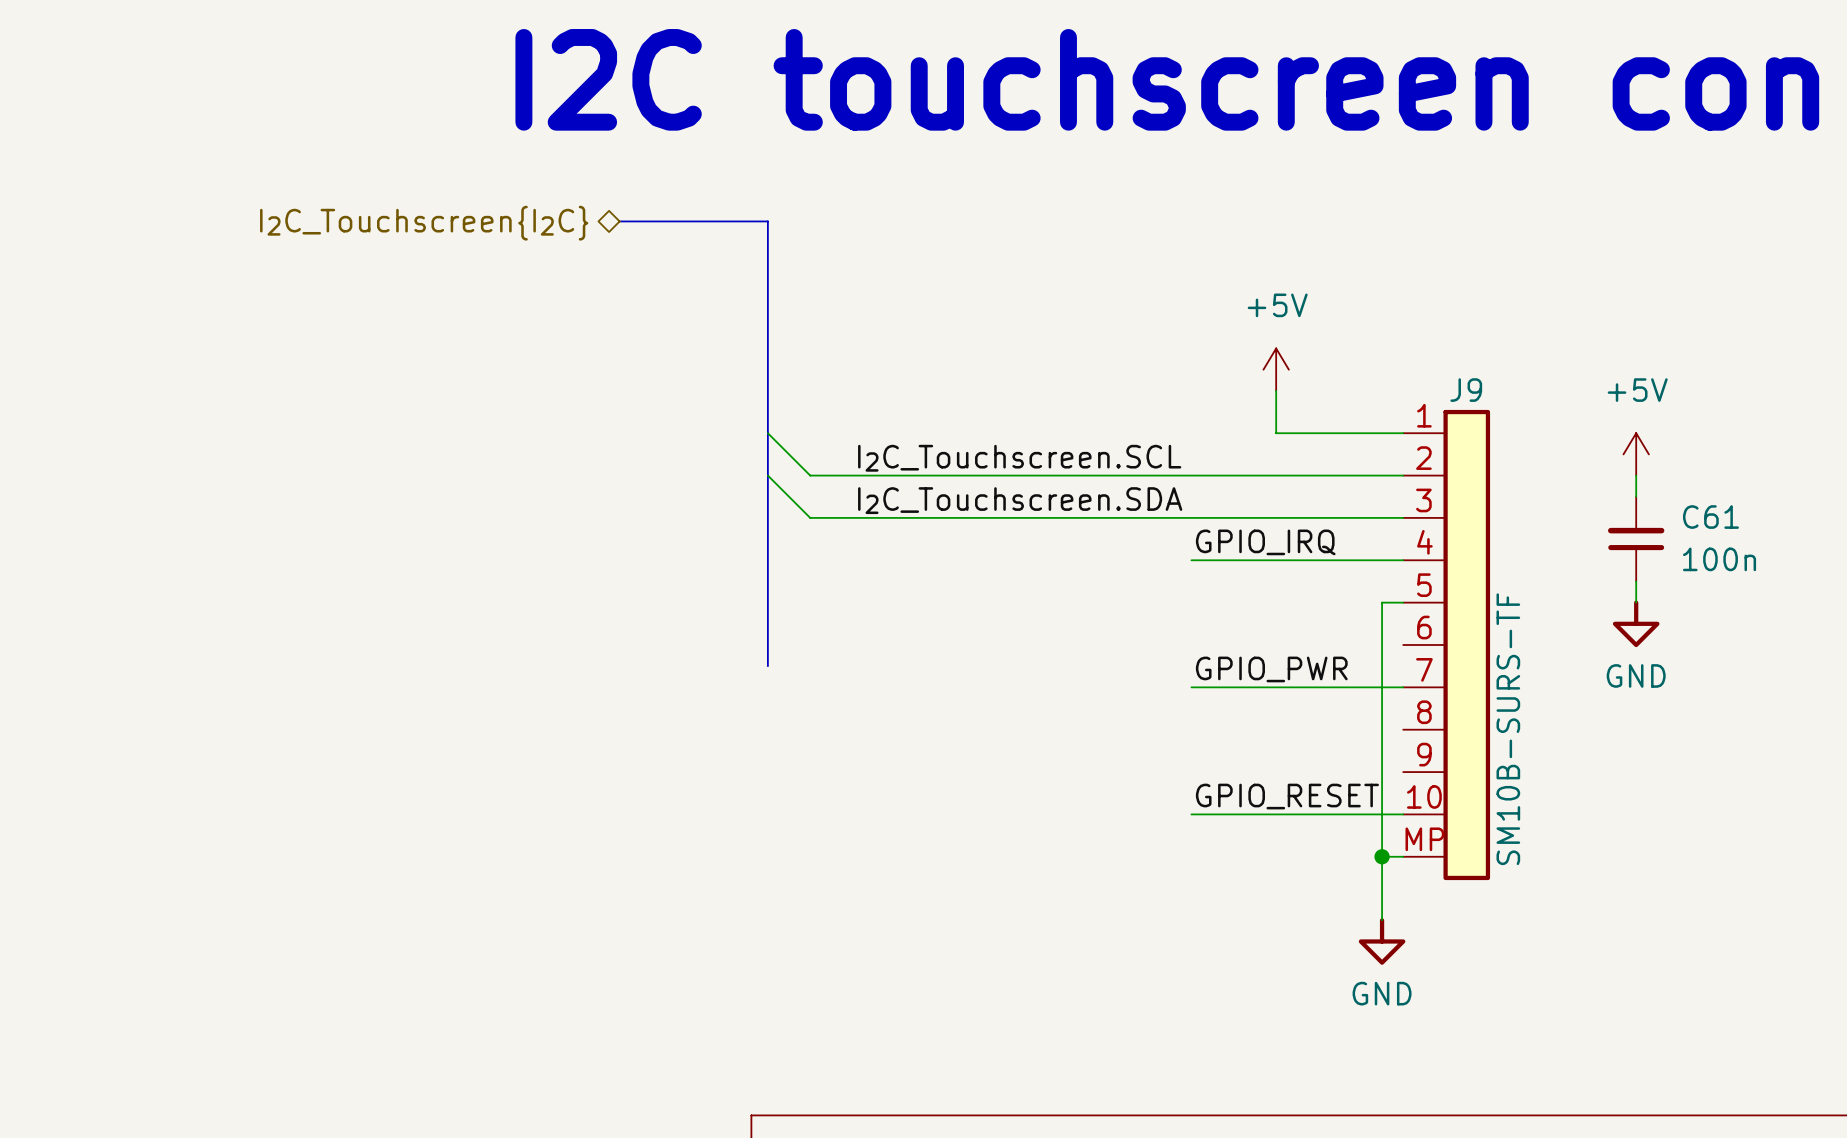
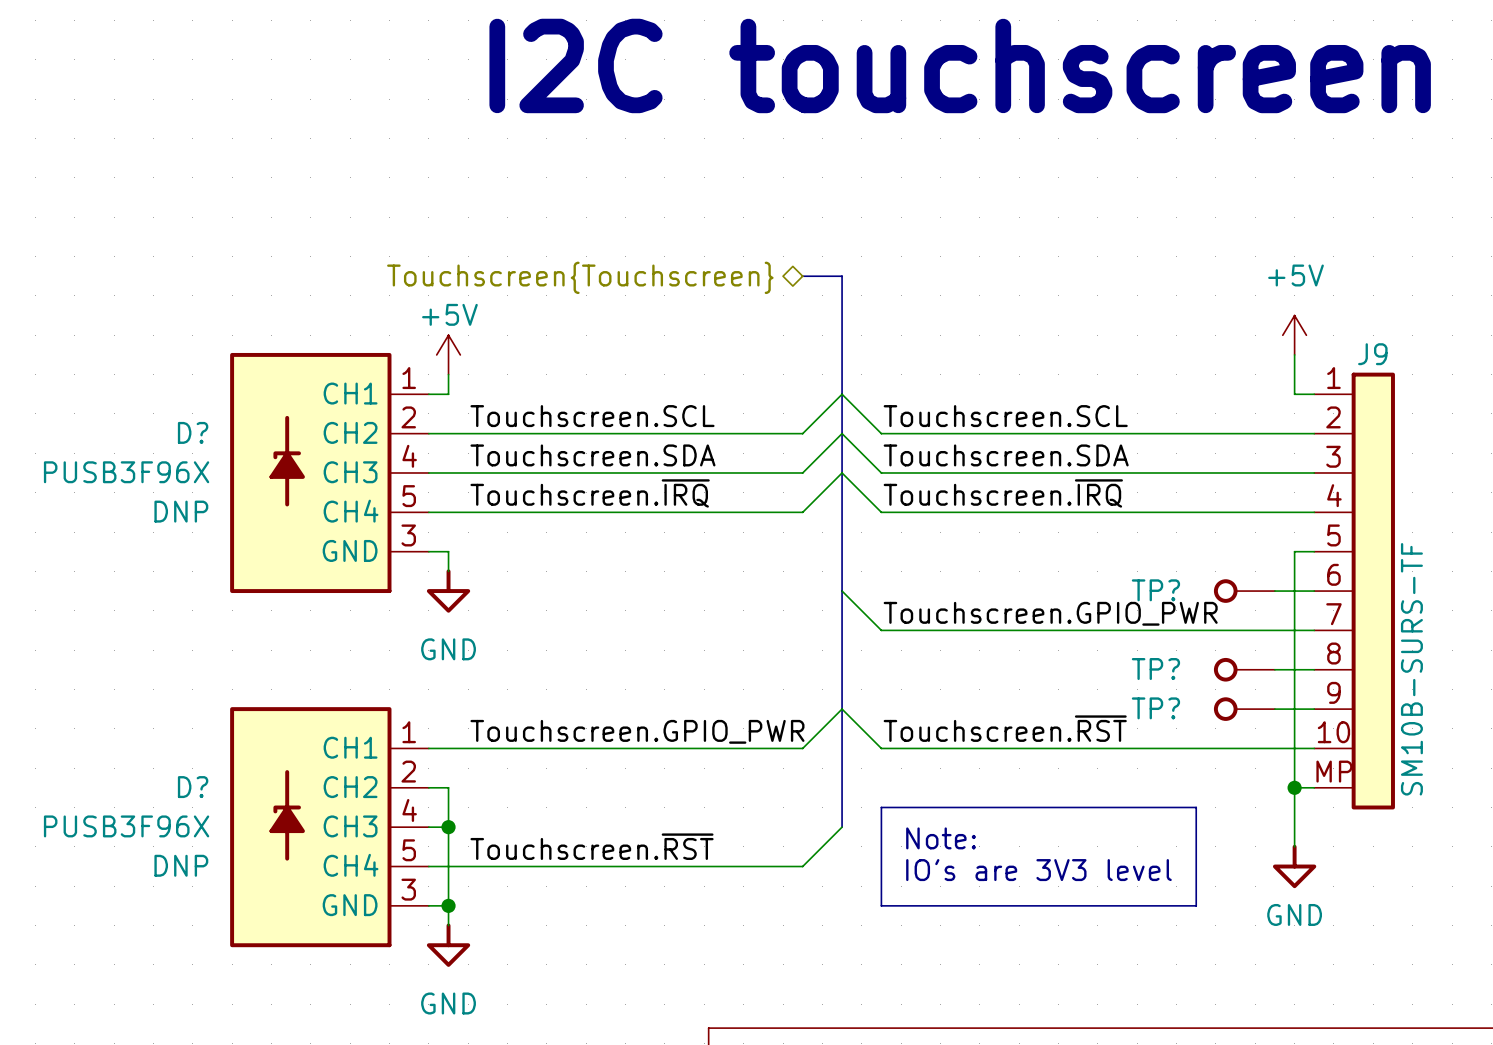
bus: (619, 221) (767, 221) (767, 666) -> none
hierarchical label: I2C_Touchscreen{I2C} (424, 223) -> none
bus: none -> (802, 276) (842, 276) (842, 827)
hierarchical label: none -> Touchscreen{Touchscreen} (580, 277)
power symbol position: +5V (1276, 369) -> +5V (1294, 335)
power symbol: none -> +5V (448, 354)
wire: (1276, 390) (1276, 433) (1382, 433) -> (1294, 354) (1294, 394)
wire: none -> (448, 374) (448, 394) (428, 394)
wire: (767, 433) (810, 475) -> (428, 433) (763, 433)
label: none -> Touchscreen.SCL (592, 416)
label: none -> Touchscreen.SCL (1005, 416)
label: I2C_Touchscreen.SCL (1019, 458) -> none
wire: (767, 475) (810, 517) -> (428, 472) (763, 472)
wire: (852, 475) (937, 475) -> (802, 433) (842, 394) (881, 433)
label: none -> Touchscreen.SDA (592, 455)
label: none -> Touchscreen.SDA (1006, 455)
label: I2C_Touchscreen.SDA (1020, 500) -> none
D?: none -> (329, 472)
wire: (852, 517) (937, 517) -> (802, 472) (842, 433) (881, 472)
label: none -> Touchscreen.~{IRQ} (590, 493)
label: none -> Touchscreen.~{IRQ} (1003, 493)
label: GPIO_IRQ (1265, 542) -> none
wire: none -> (428, 512) (802, 512) (842, 472) (881, 512) (1117, 512)
wire: none -> (428, 551) (448, 551) (448, 571)
power symbol: none -> GND (448, 591)
wire: none -> (842, 591) (881, 630) (1117, 630)
TP?: none -> (1244, 591)
wire: none -> (1274, 591) (1314, 591)
label: none -> Touchscreen.GPIO_PWR (1050, 613)
label: GPIO_PWR (1271, 669) -> none
TP?: none -> (1244, 669)
wire: none -> (1274, 669) (1314, 669)
TP?: none -> (1244, 709)
wire: none -> (1274, 709) (1314, 709)
label: none -> Touchscreen.~{RST} (1005, 728)
label: none -> Touchscreen.GPIO_PWR (637, 731)
label: GPIO_RESET (1287, 796) -> none
wire: none -> (428, 748) (802, 748) (842, 709) (881, 748) (1117, 748)
wire: none -> (428, 787) (448, 787) (448, 925)
line: none -> (881, 807) (881, 905) (1196, 905) (1196, 807) (881, 807)
D?: none -> (329, 827)
wire: none -> (428, 827) (448, 827)
junction: none -> (448, 827)
wire: none -> (842, 827) (802, 866) (428, 866)
text: none -> Note: (941, 838)
label: none -> Touchscreen.~{RST} (592, 846)
text: none -> IO's are 3V3 level (1038, 870)
wire: none -> (428, 905) (448, 905)
junction: none -> (448, 905)
power symbol: none -> GND (448, 945)

